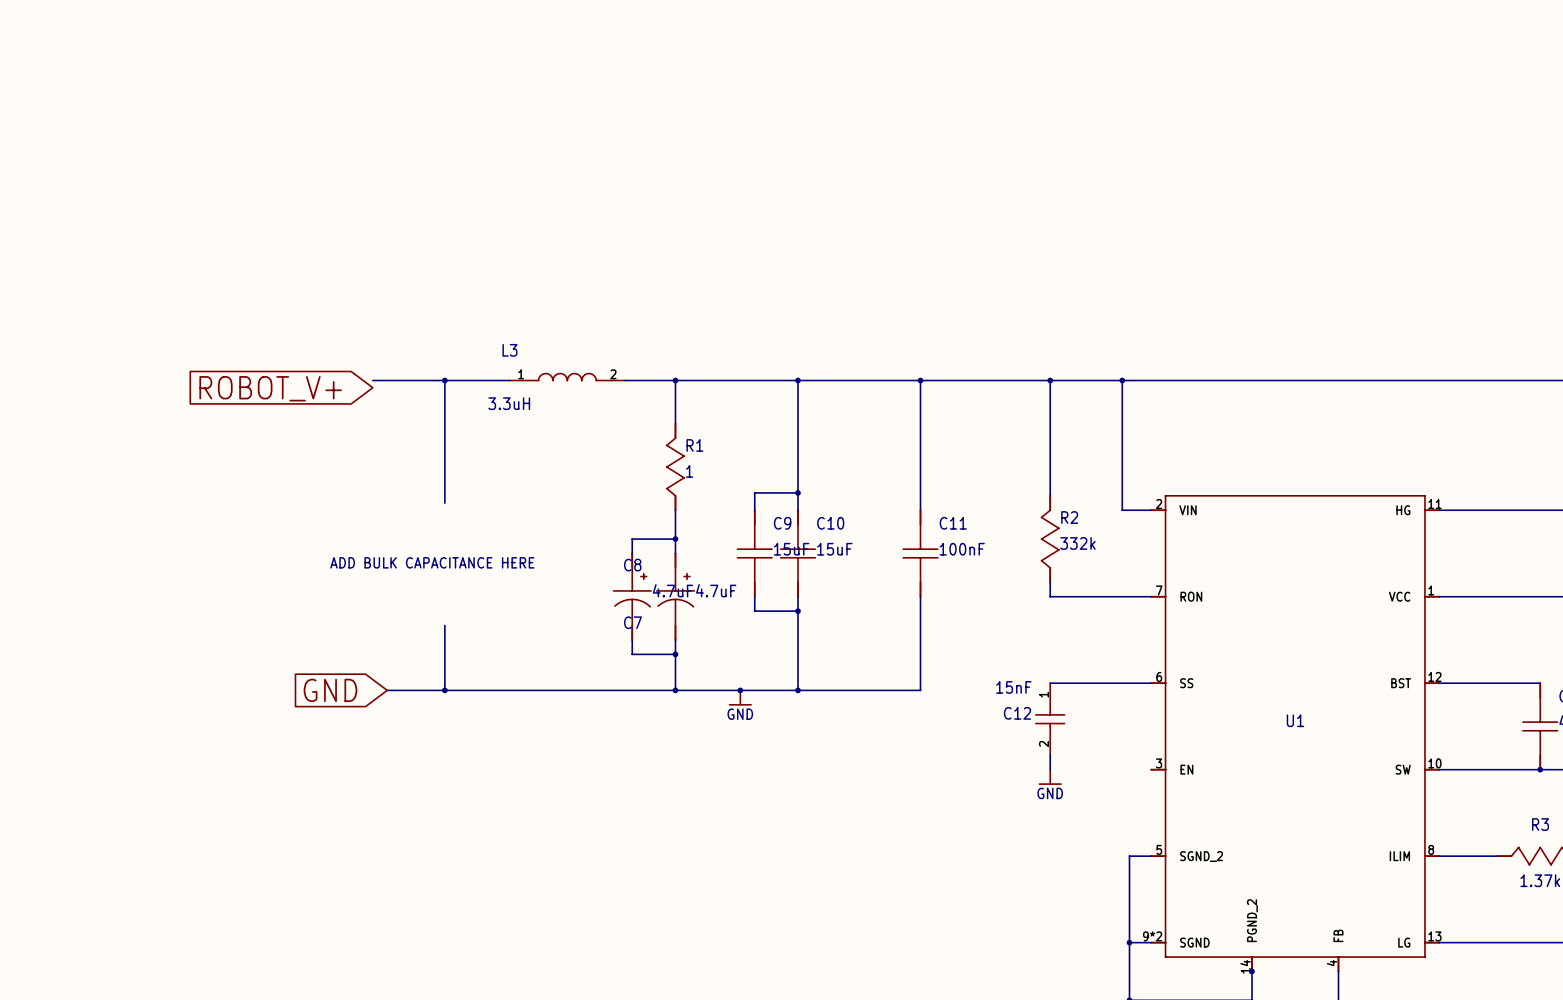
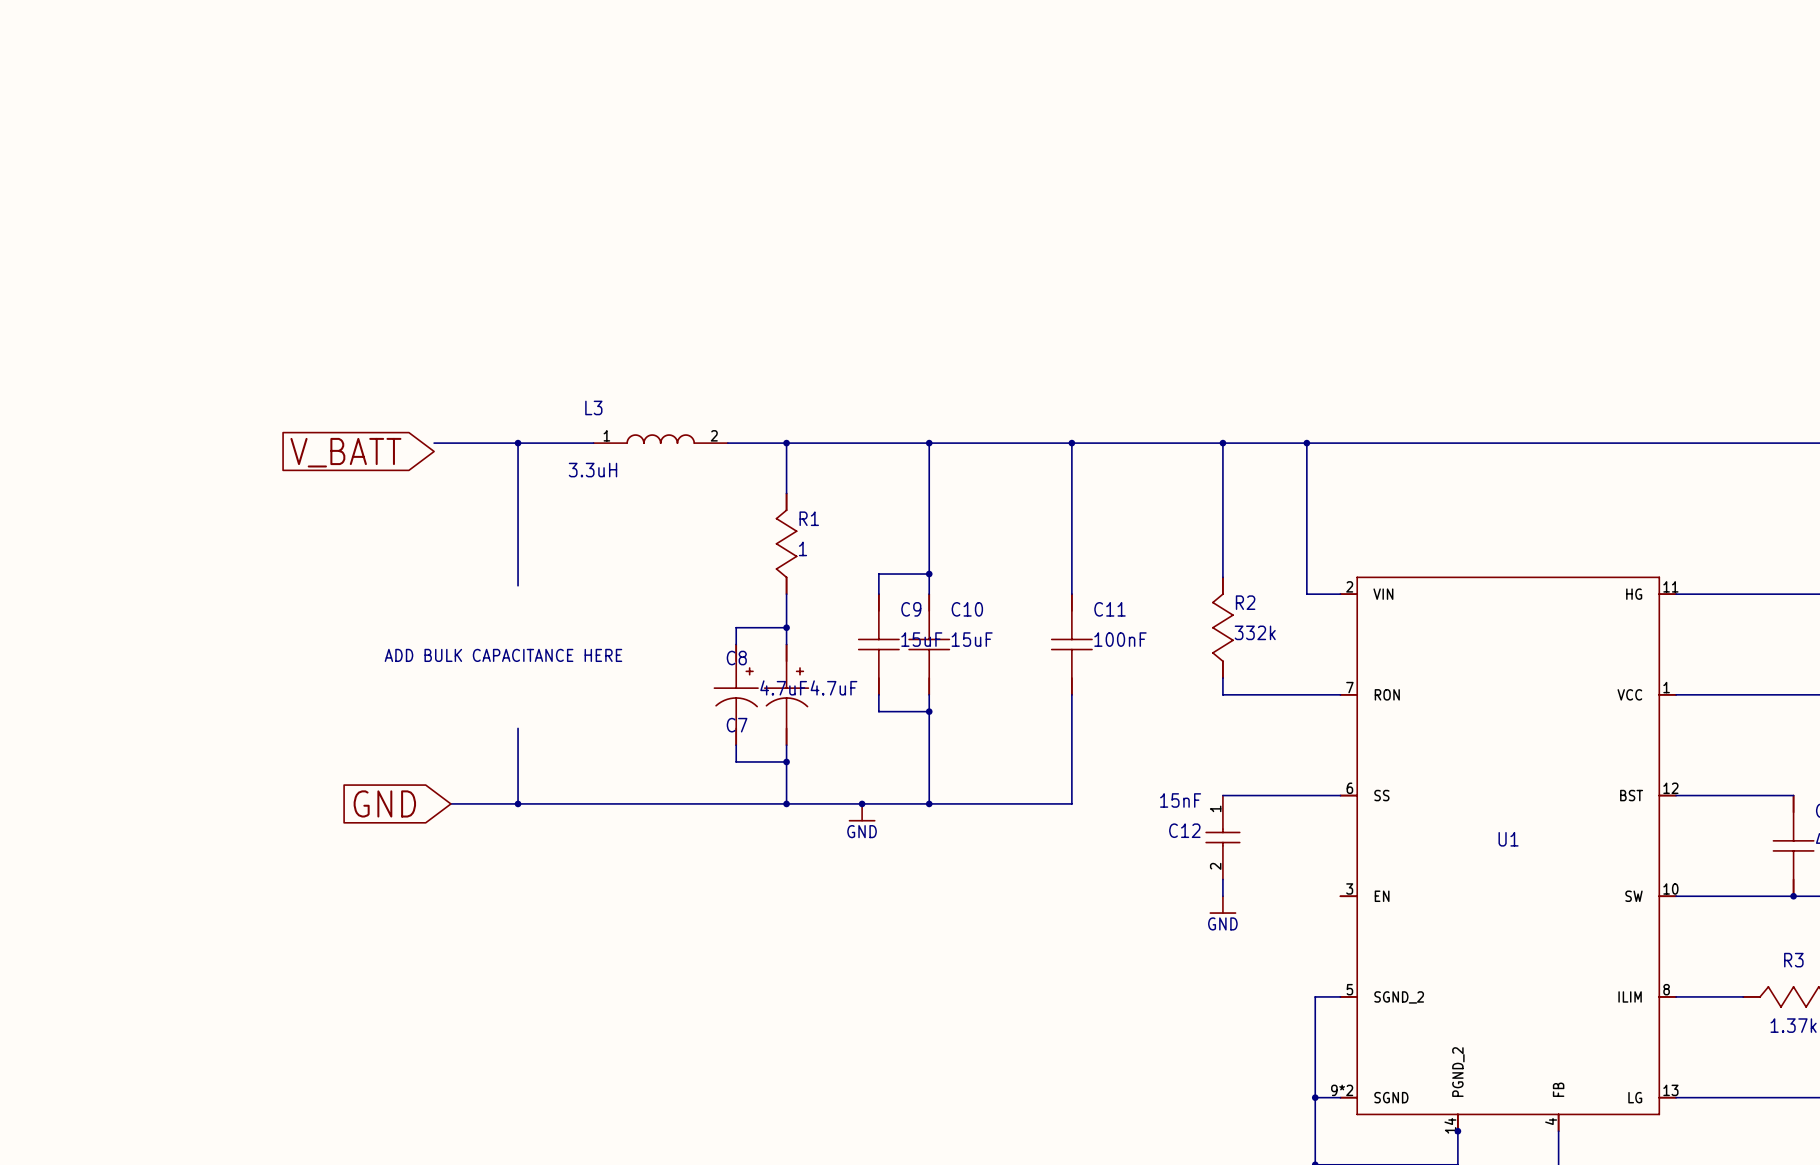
global label: ROBOT_V+ (270, 388) -> V_BATT (345, 452)

